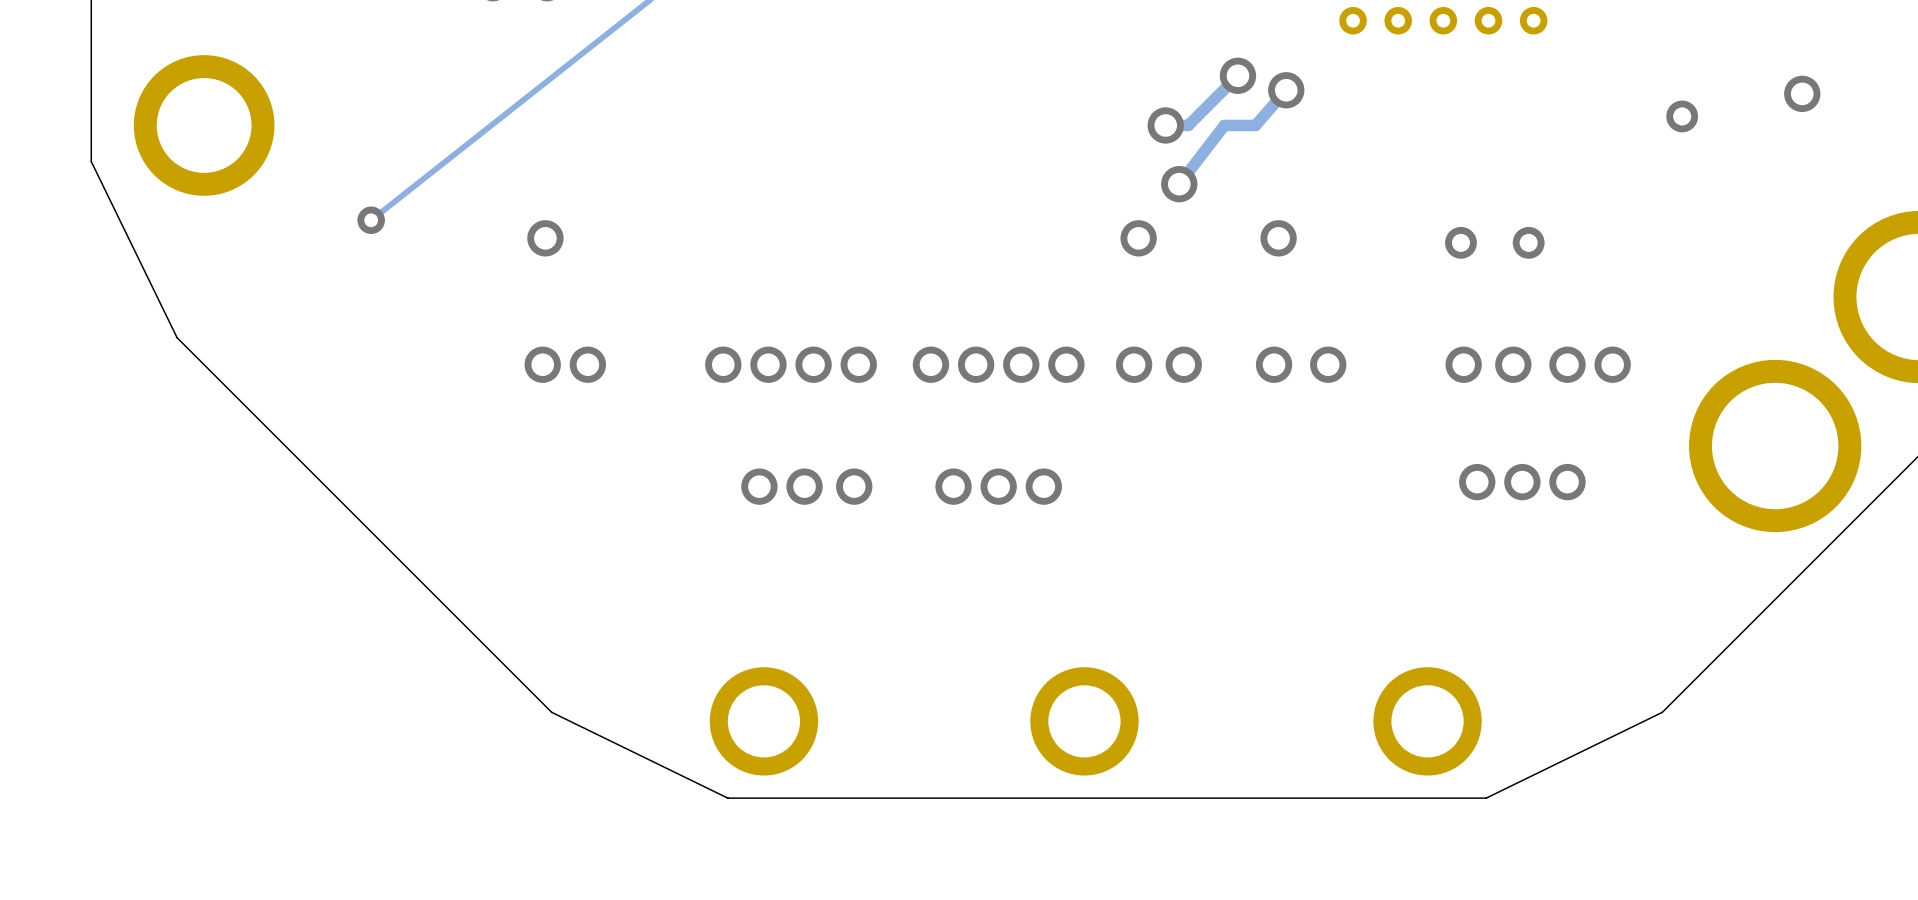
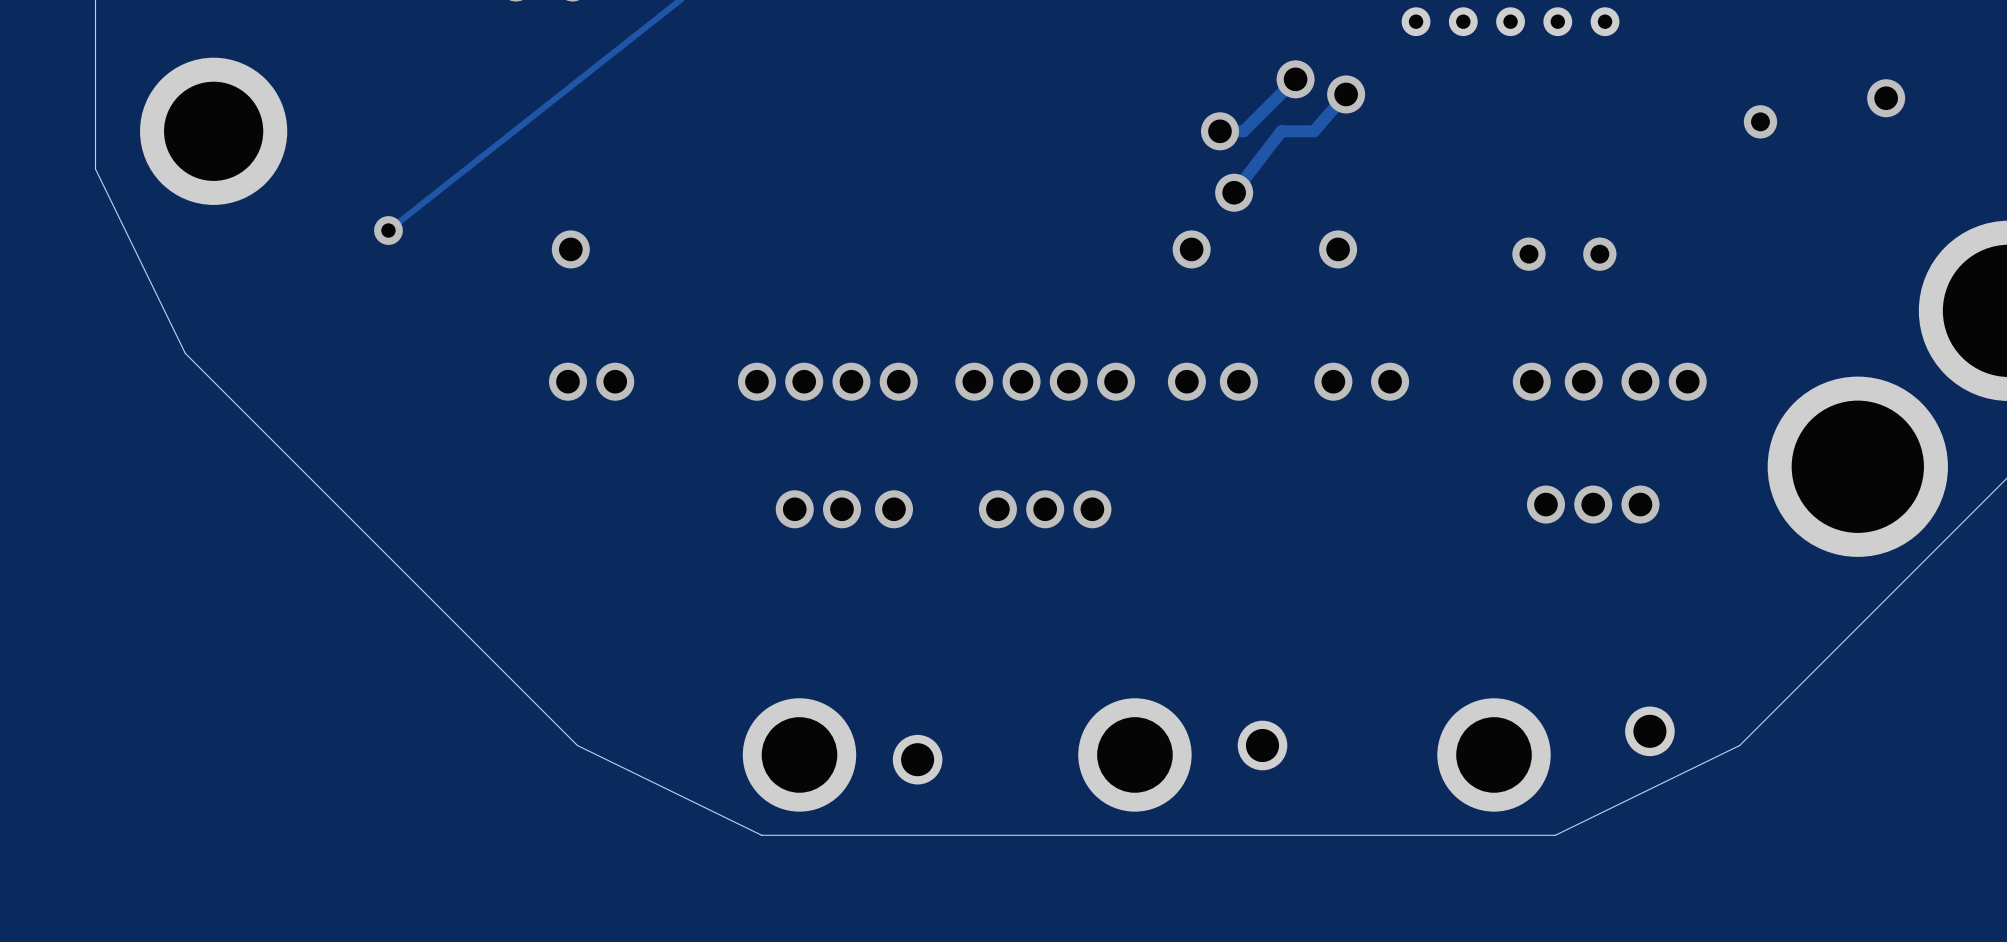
part: none -> (1649, 731)
part: none -> (1262, 745)
part: none -> (917, 759)

